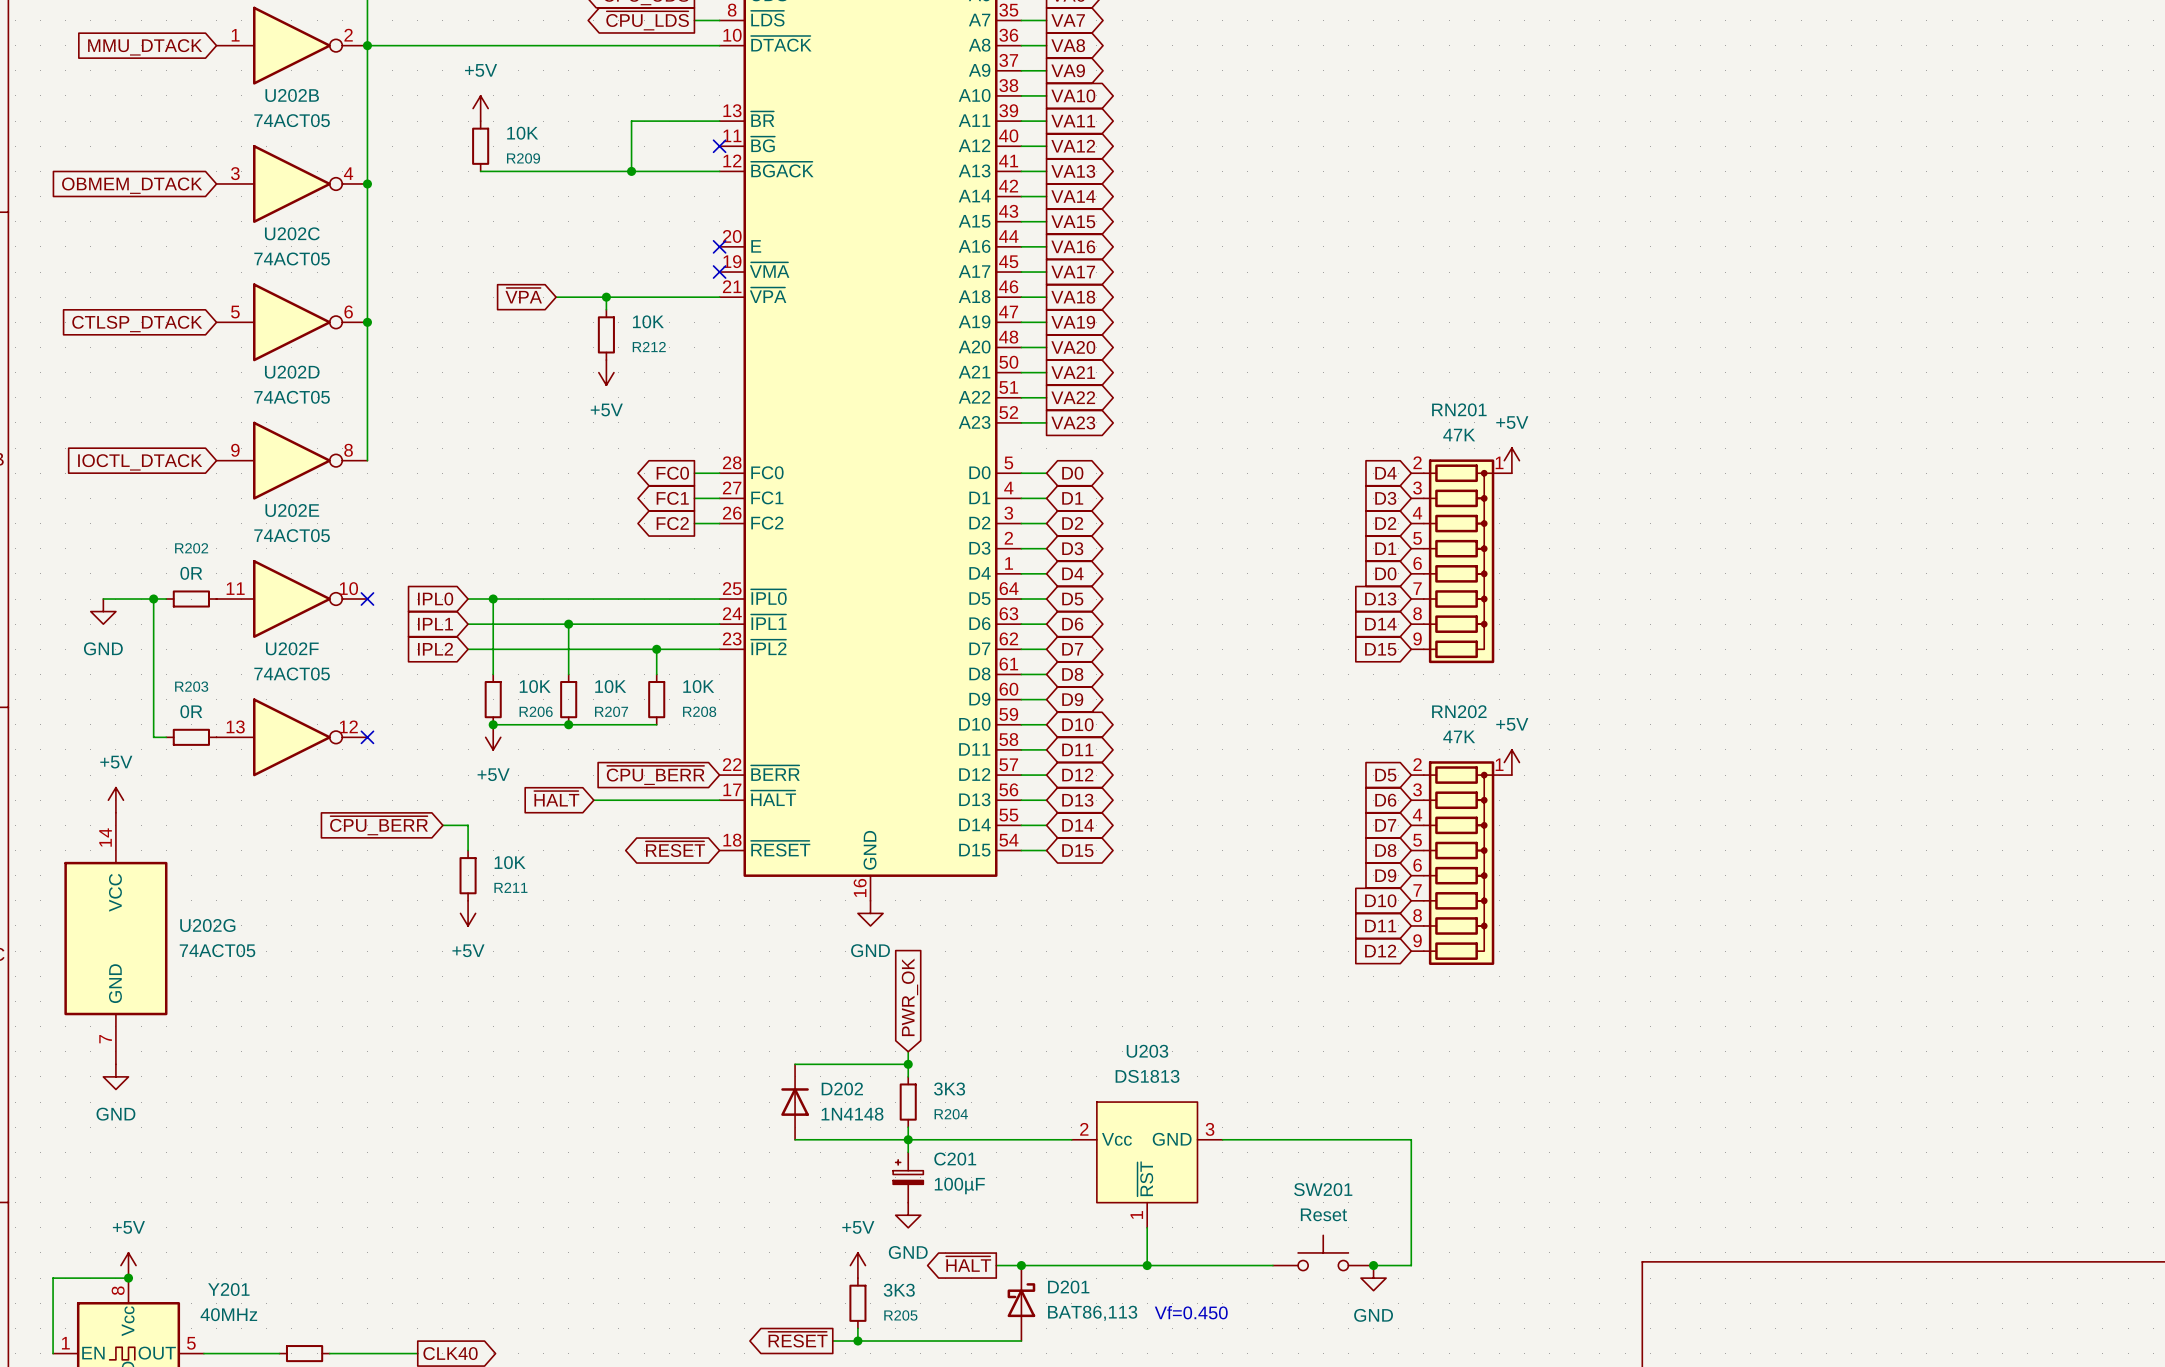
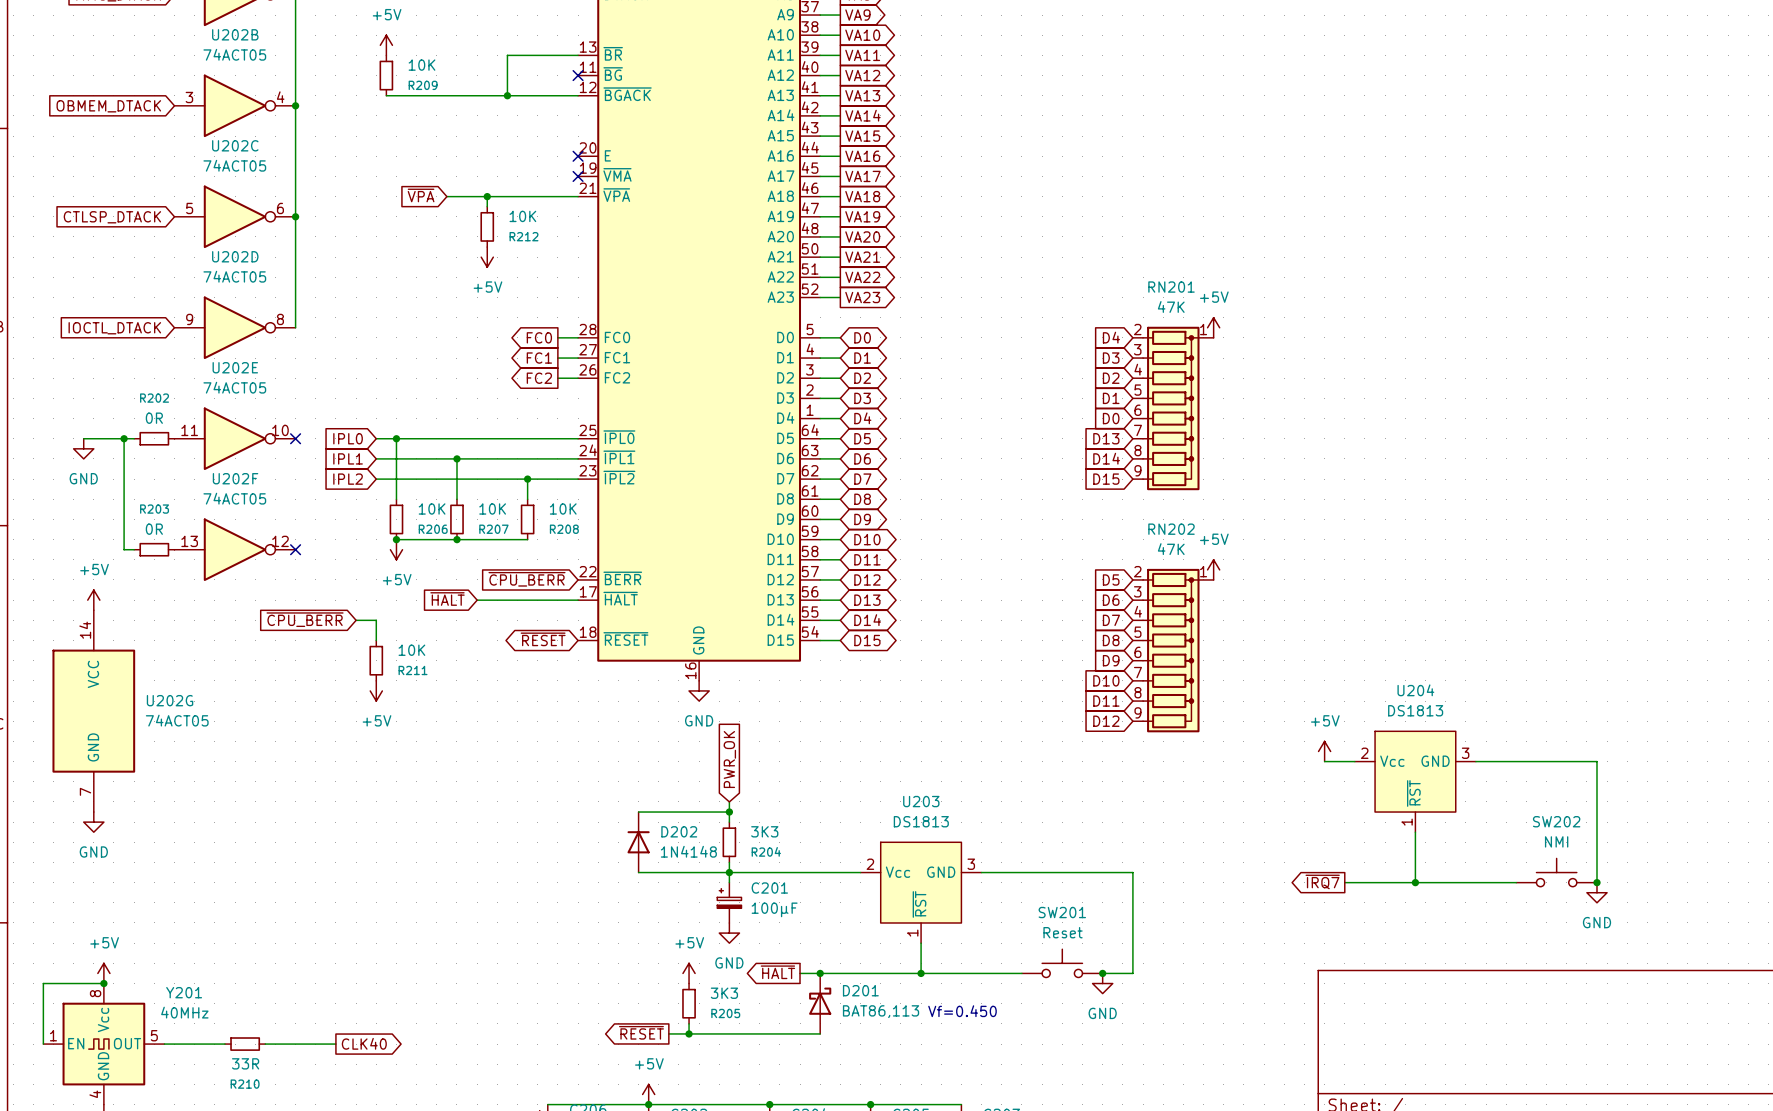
power symbol: none -> +5V (1324, 751)
wire: none -> (1324, 761) (1354, 761)
wire: none -> (1475, 761) (1596, 761) (1596, 882)
U204: none -> DS1813 (1415, 781)
wire: none -> (1415, 832) (1415, 882)
SW202: none -> NMI (1556, 872)
global label: none -> ~{IRQ7} (1322, 881)
wire: none -> (1344, 882) (1516, 882)
junction: none -> (1415, 882)
junction: none -> (1596, 882)
power symbol: none -> GND (1596, 892)

